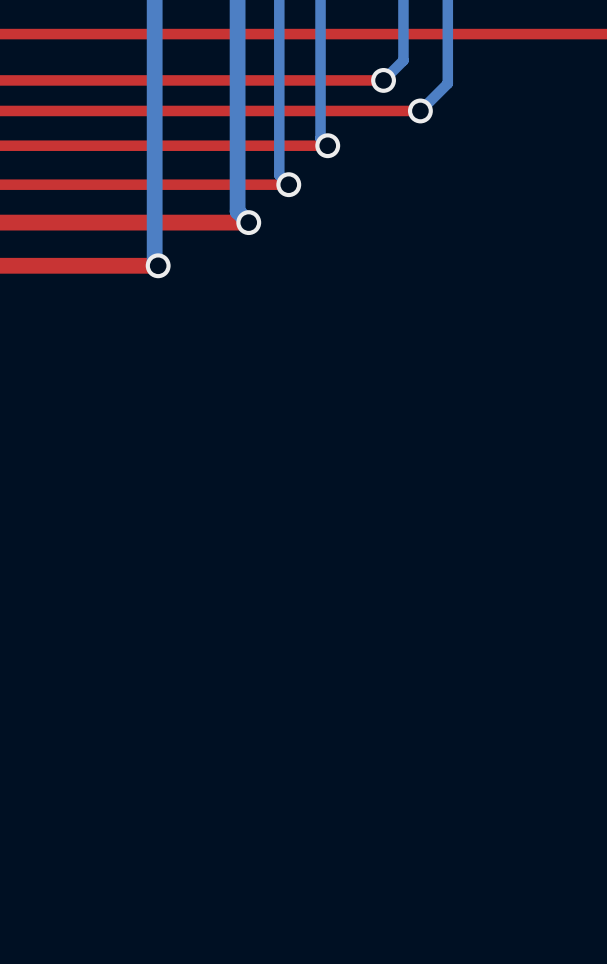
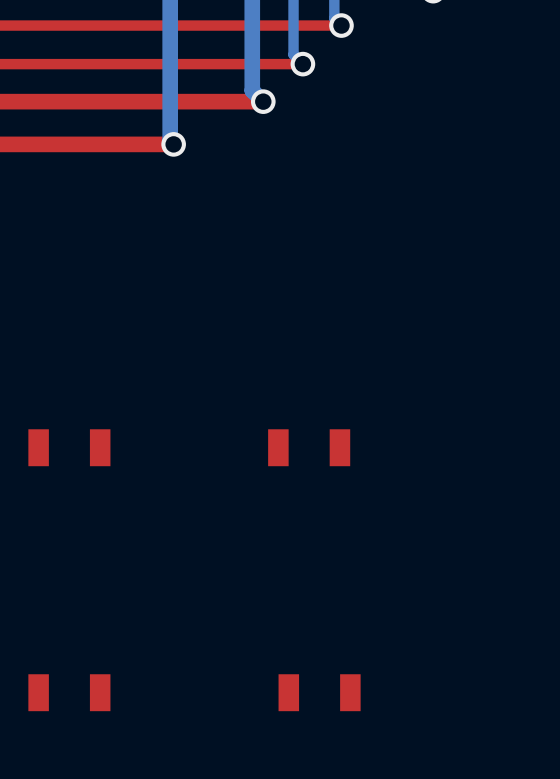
part: none -> (69, 447)
part: none -> (309, 447)
part: none -> (69, 692)
part: none -> (319, 692)

